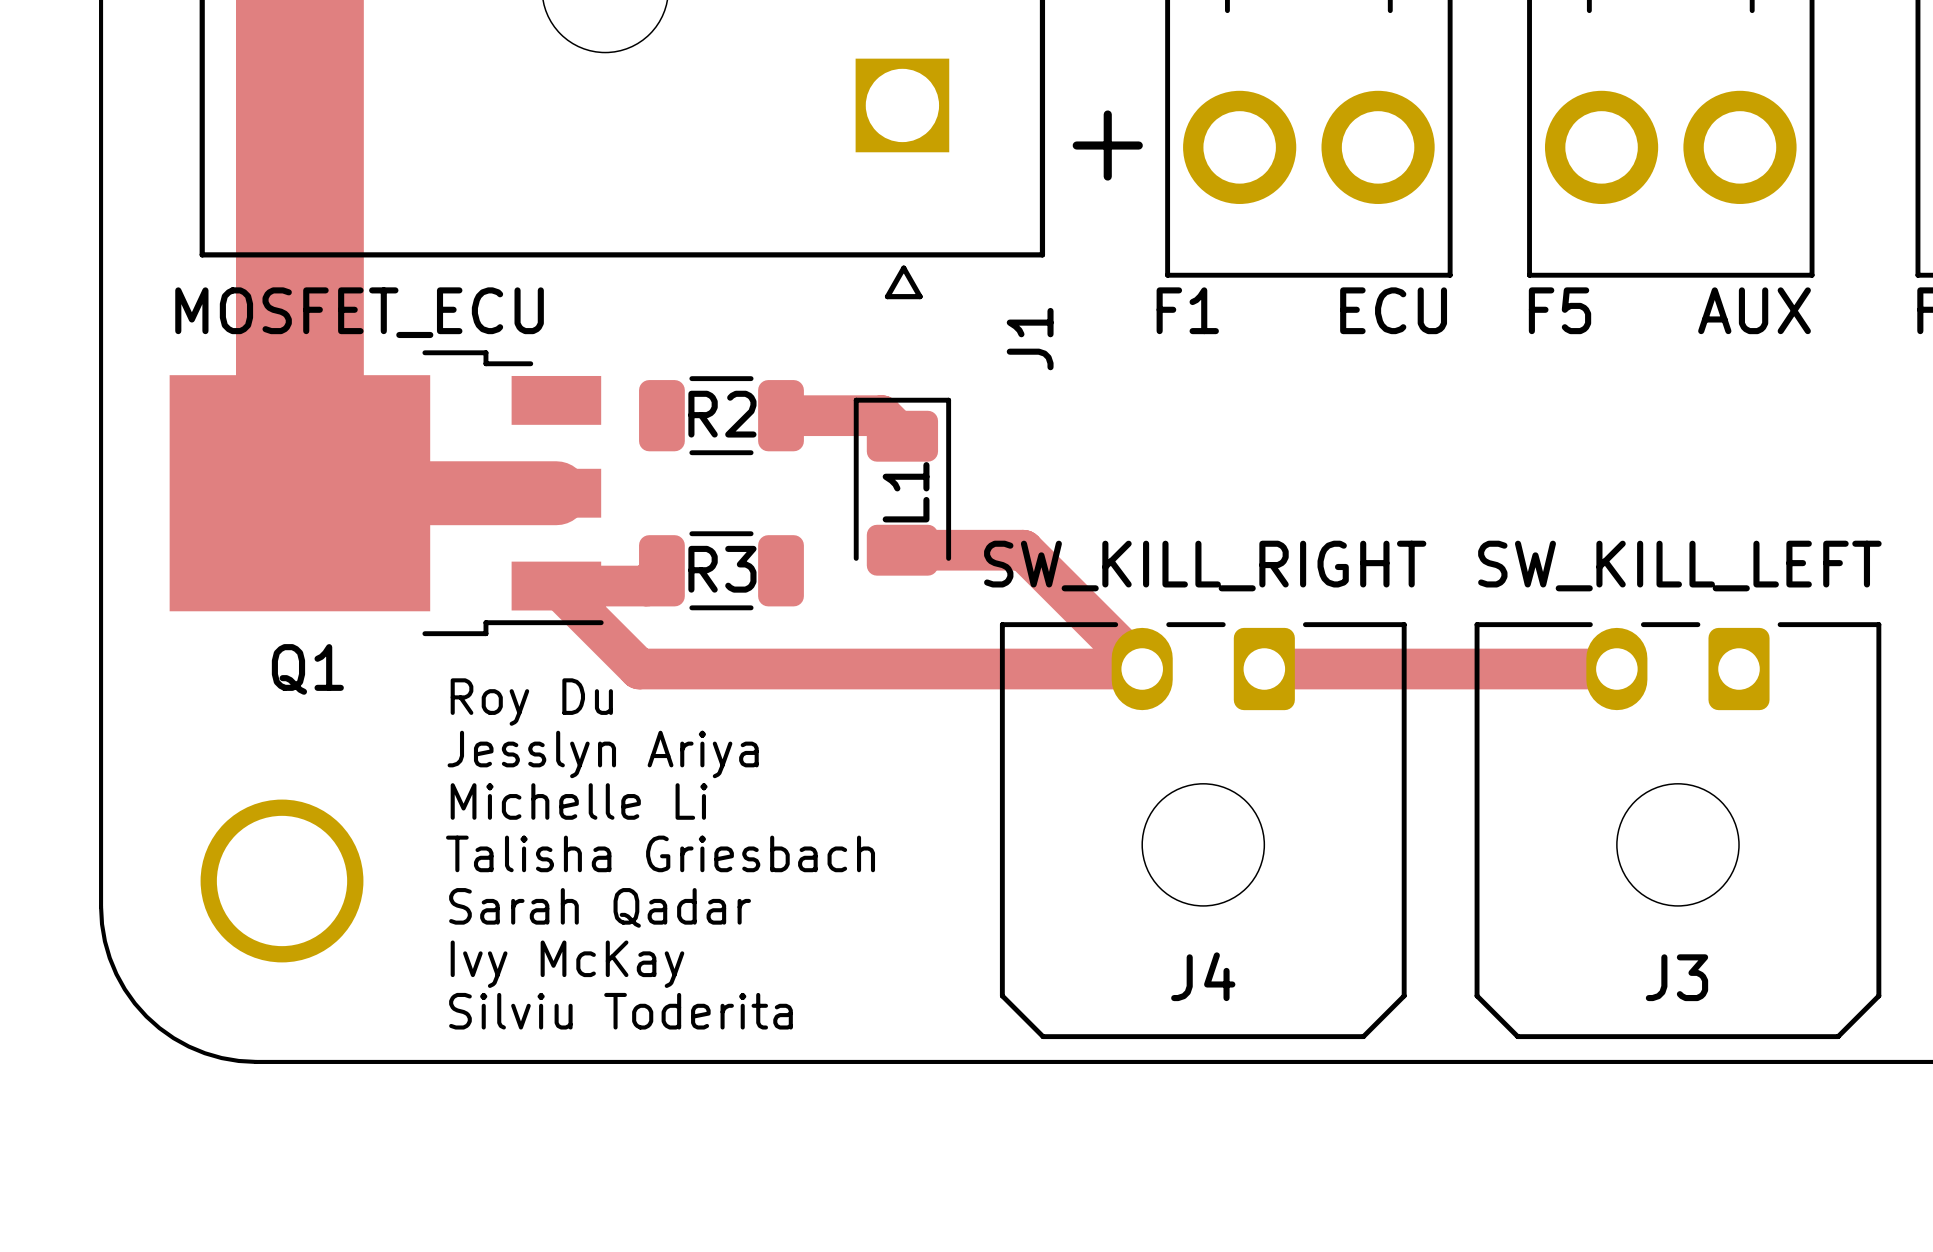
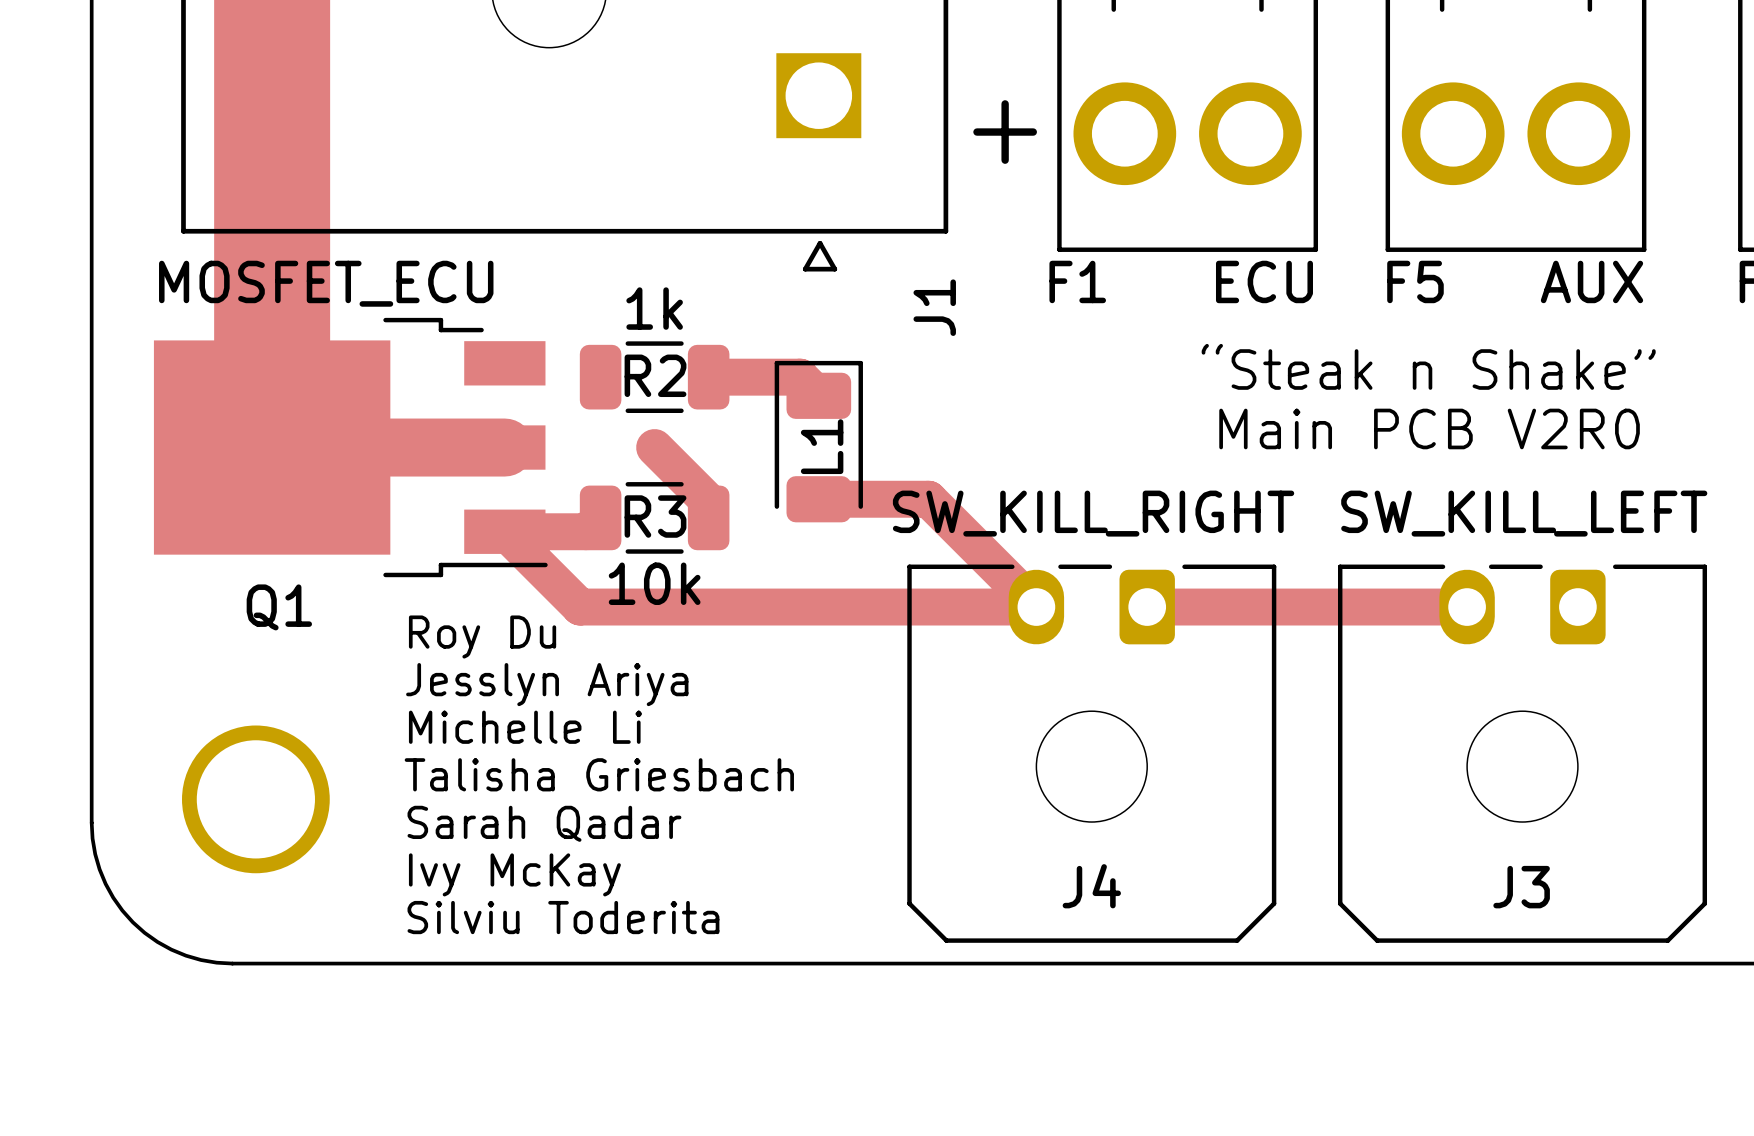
R2 value: none -> 1k (654, 308)
text: none -> “Steak n Shake” (1428, 366)
text: none -> Main PCB V2R0 (1429, 428)
track: none -> (654, 447) (708, 501) (708, 517)
R3 value: none -> 10k (654, 583)

